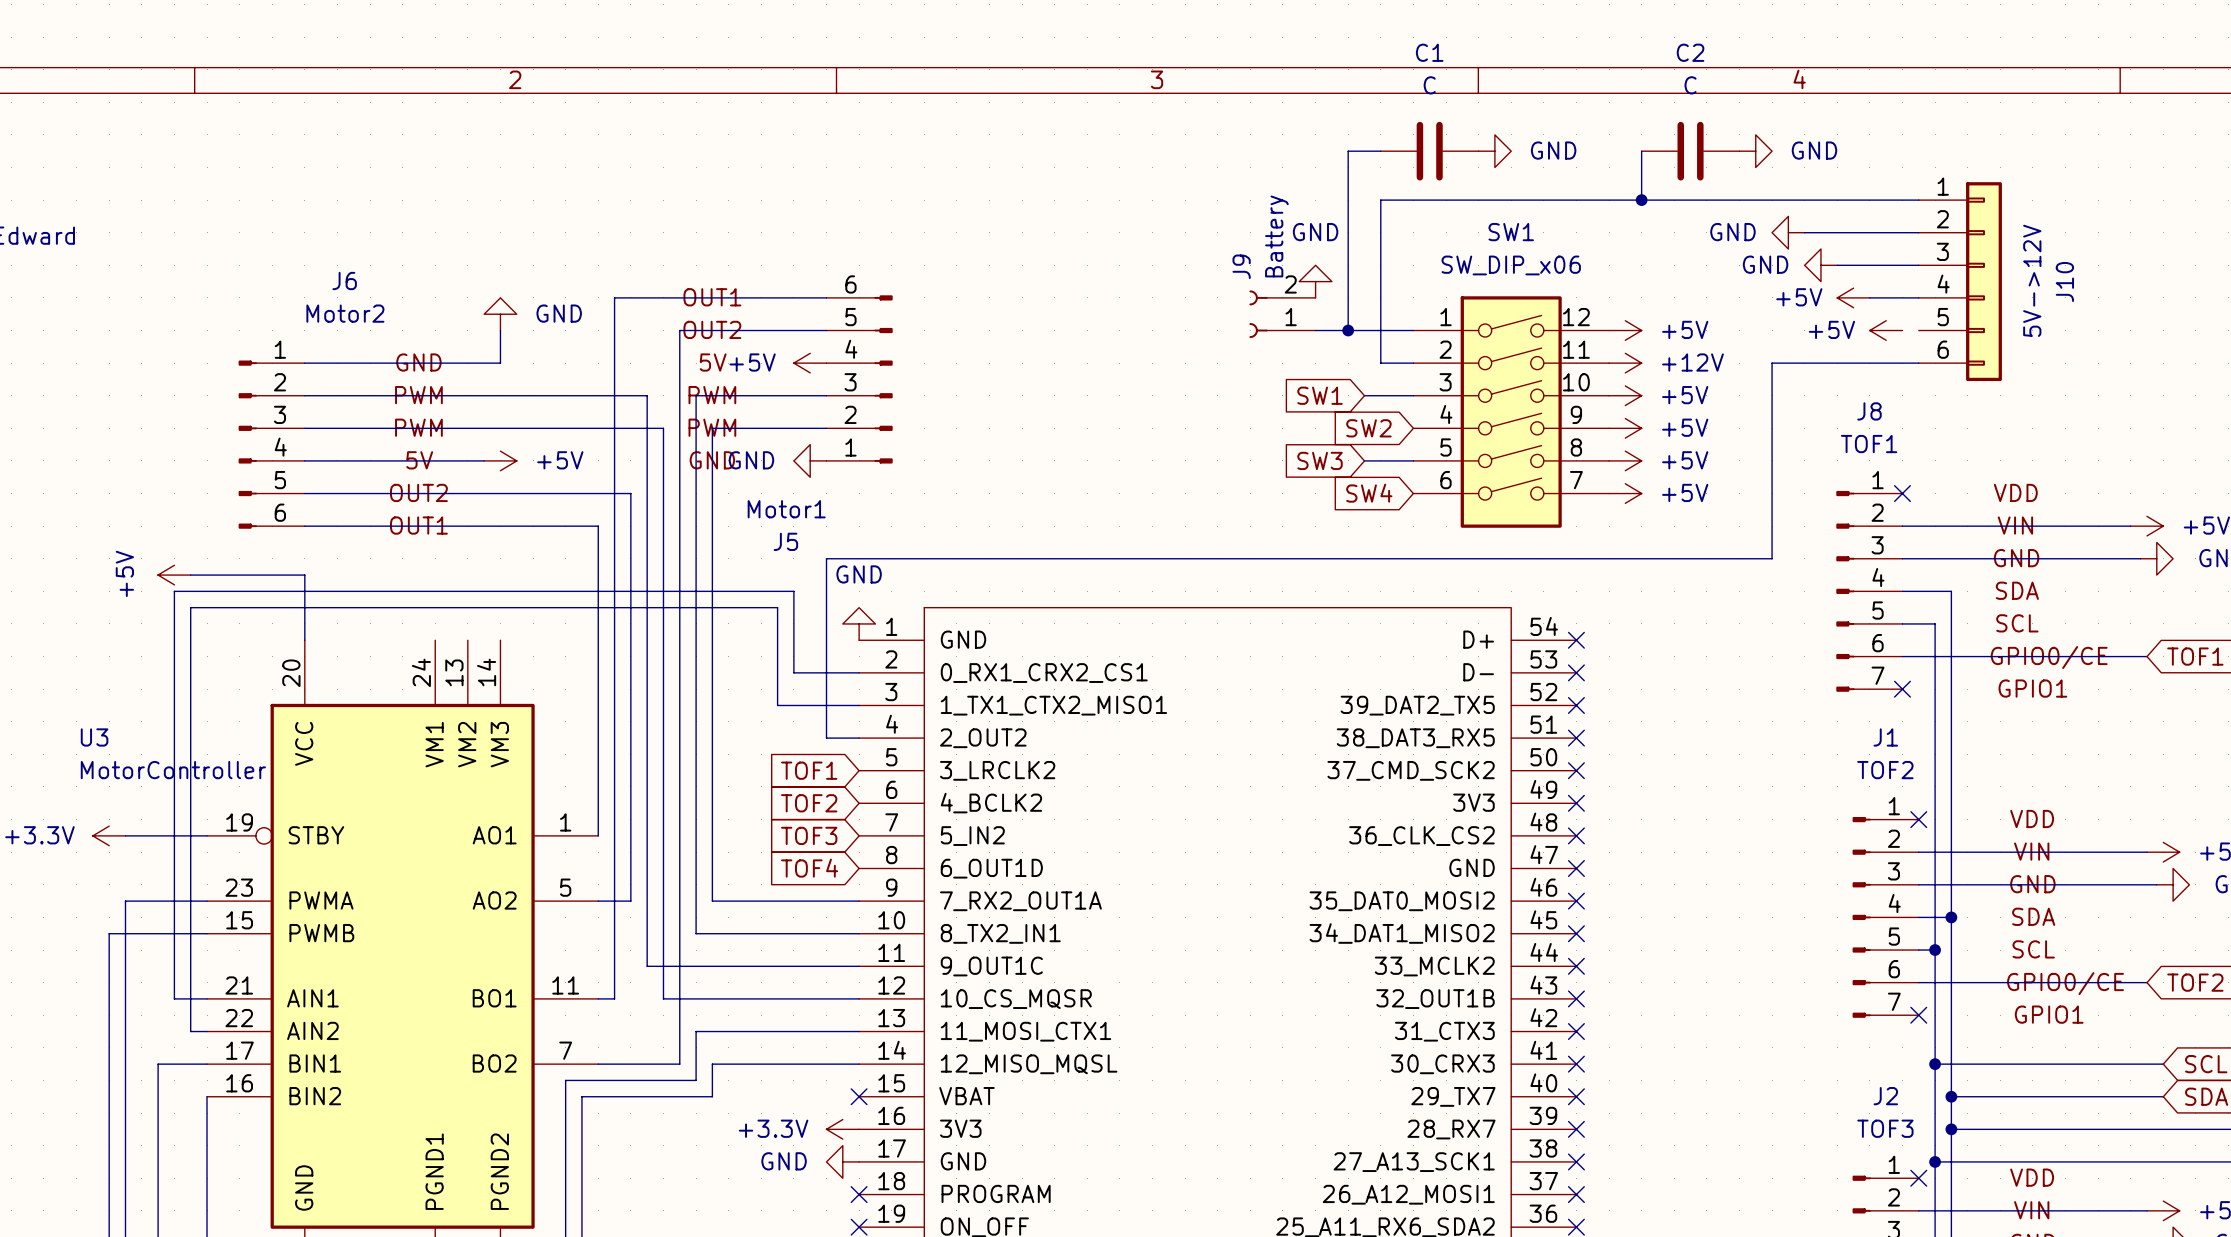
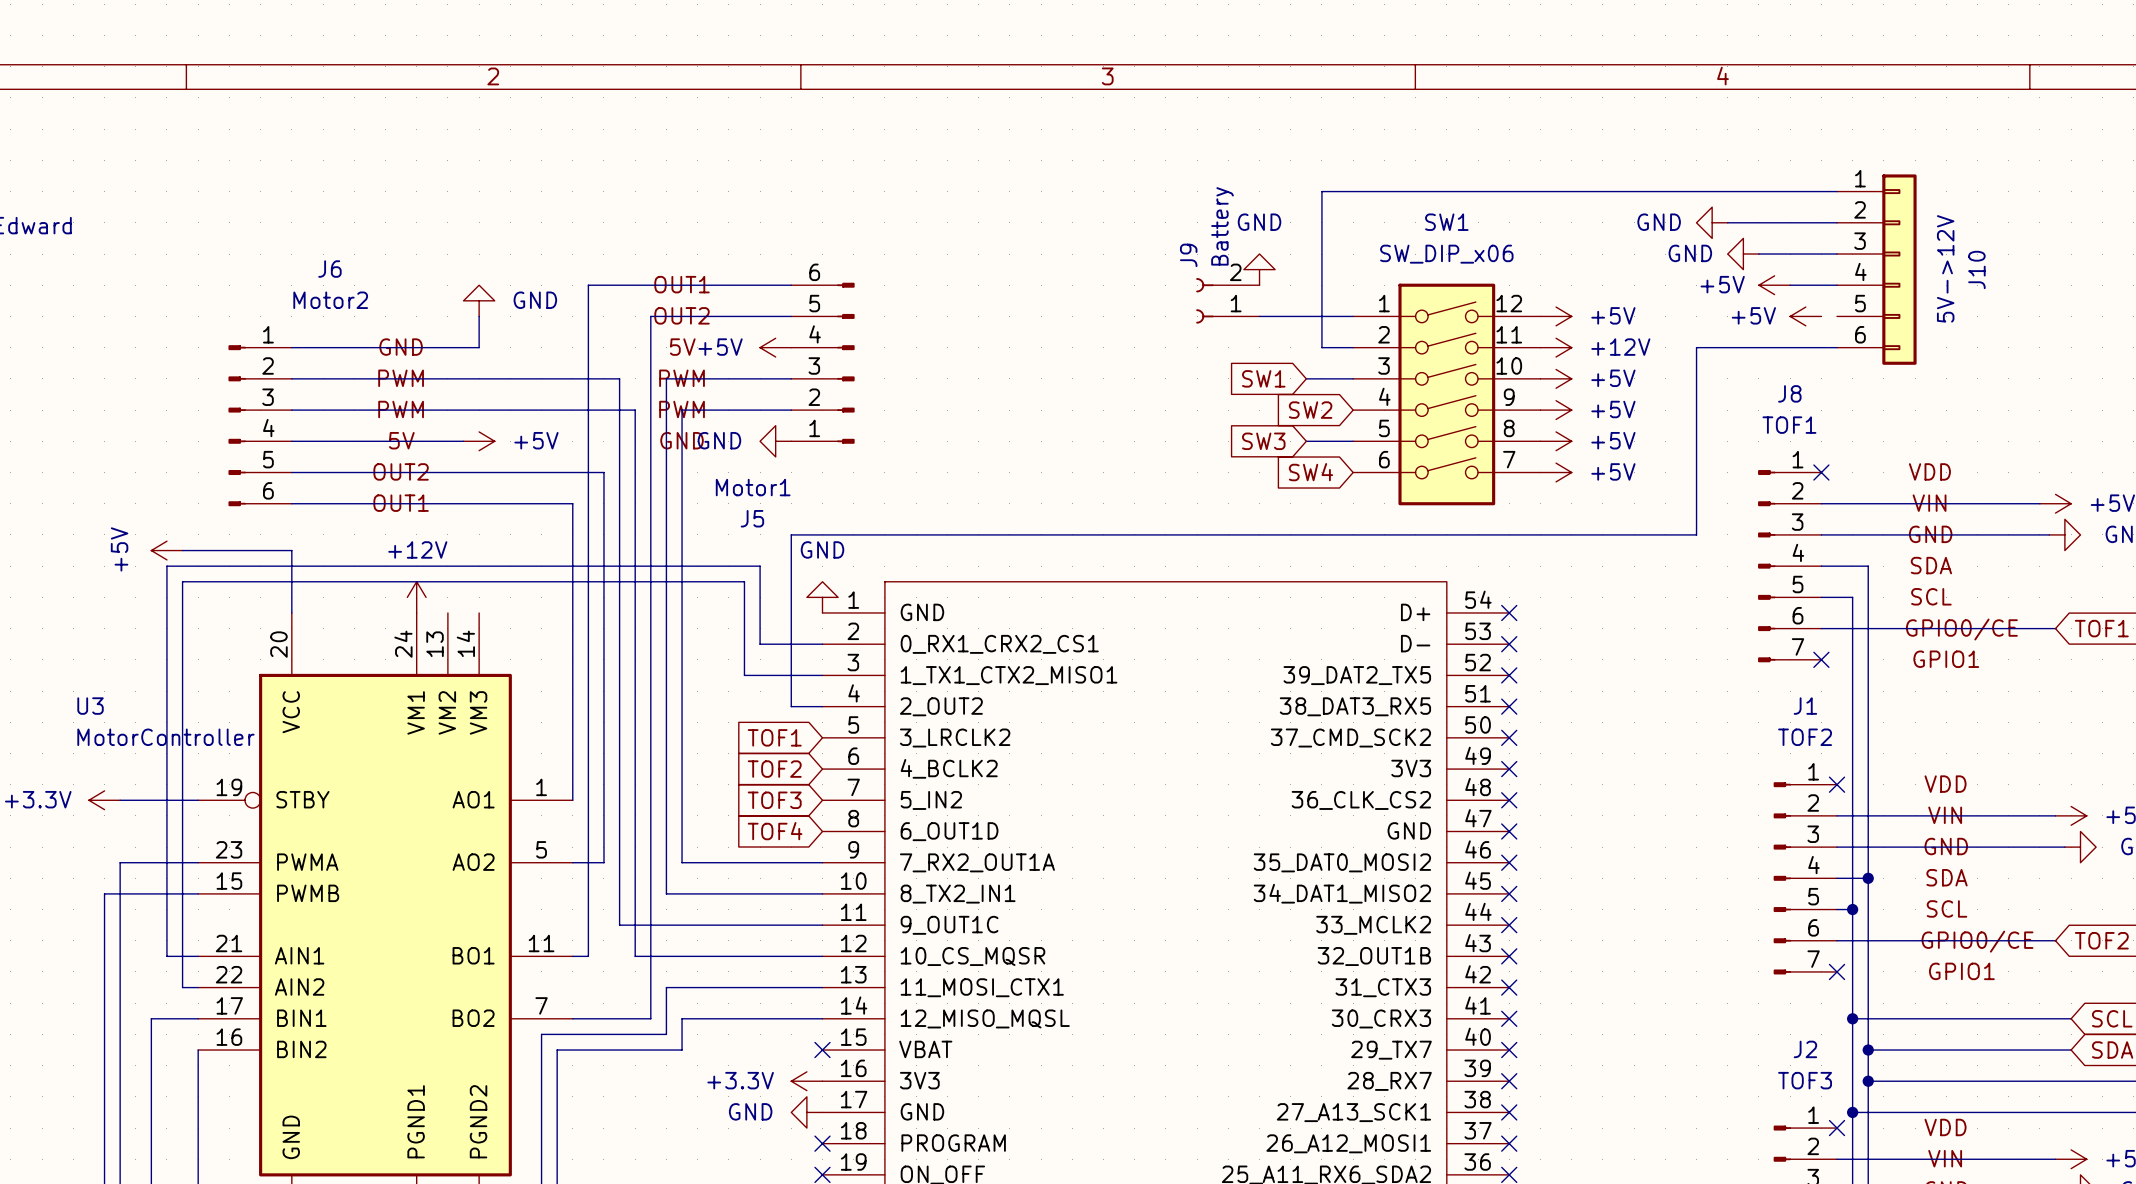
wire: (1380, 151) (1348, 151) (1348, 330) -> none
C1: C (1429, 151) -> none
power symbol: GND (1494, 151) -> none
wire: (1641, 151) (1641, 200) -> none
C2: C (1690, 151) -> none
power symbol: GND (1755, 151) -> none
junction: (1641, 200) -> none
junction: (1348, 330) -> none
power symbol: none -> +12V (416, 597)

